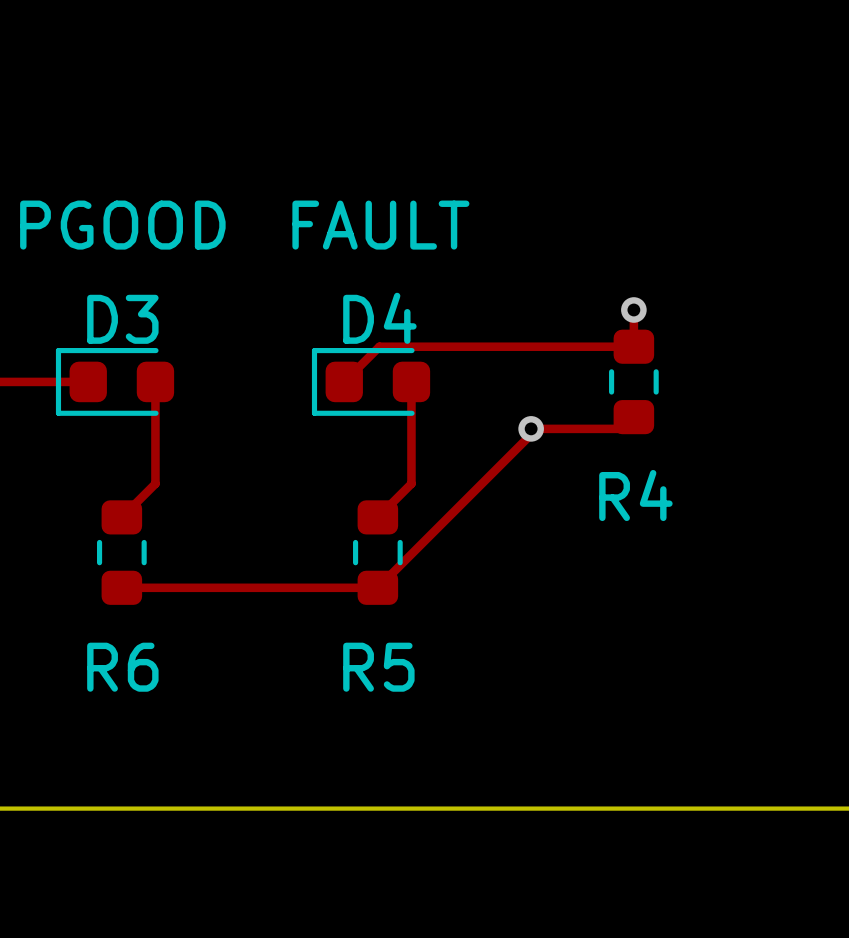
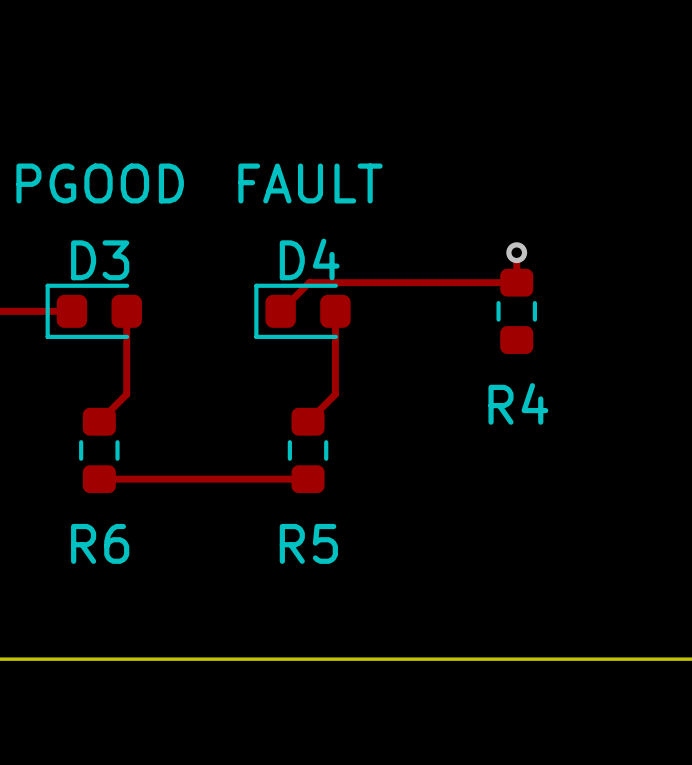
track: (633, 417) (622, 428) (531, 428) (531, 434) (377, 587) -> none
via: (531, 428) -> none

